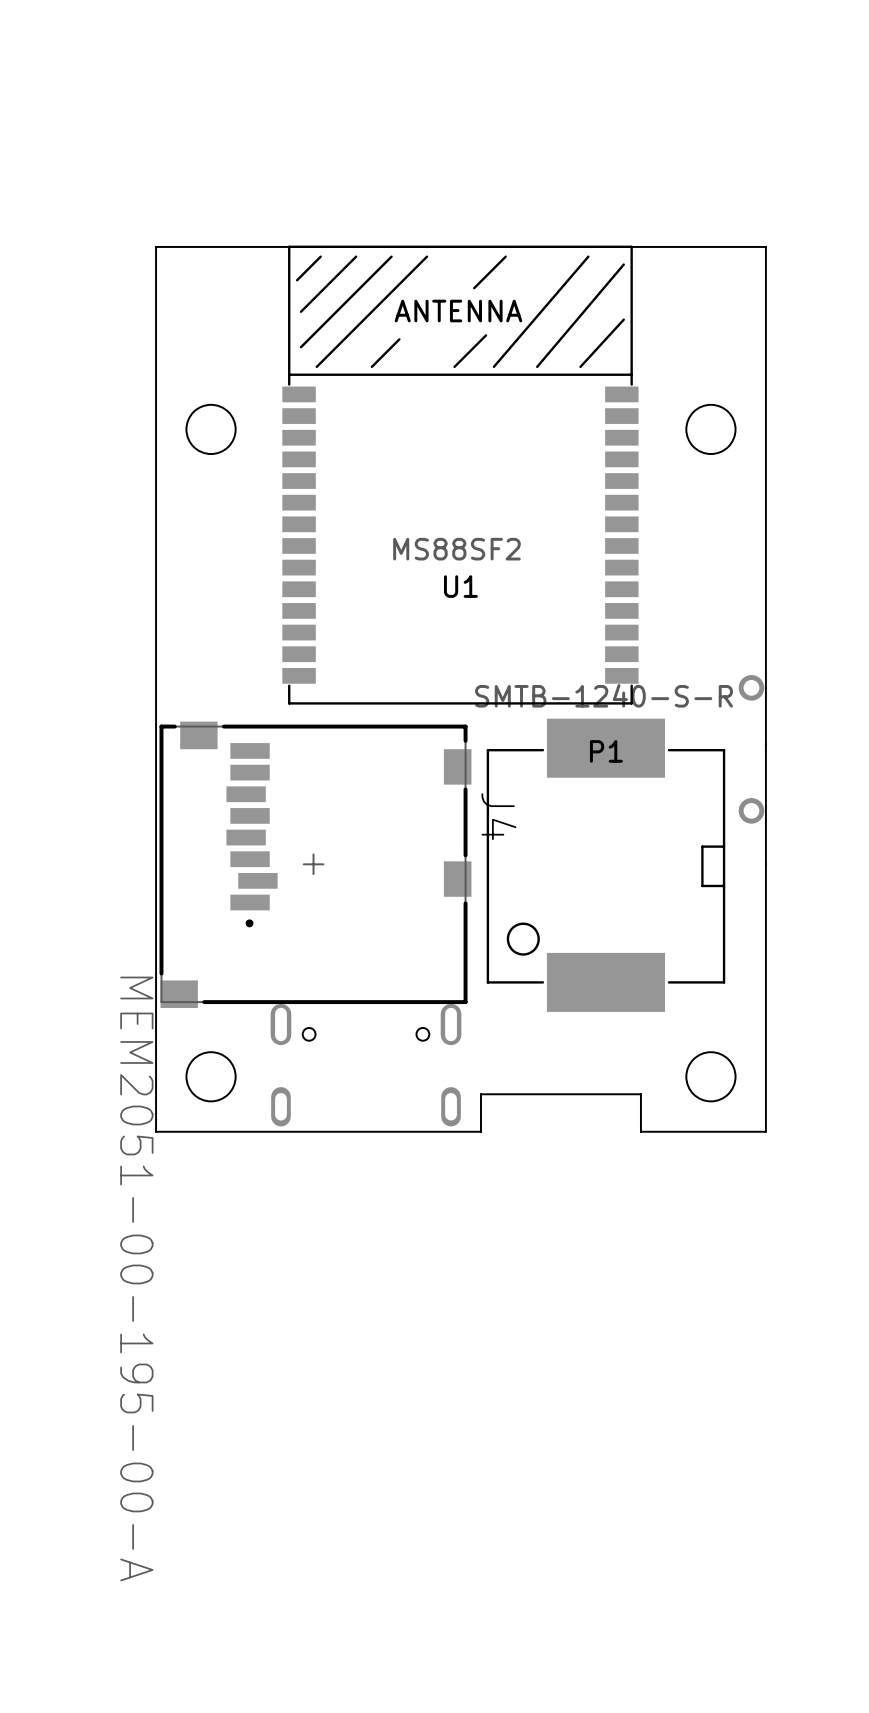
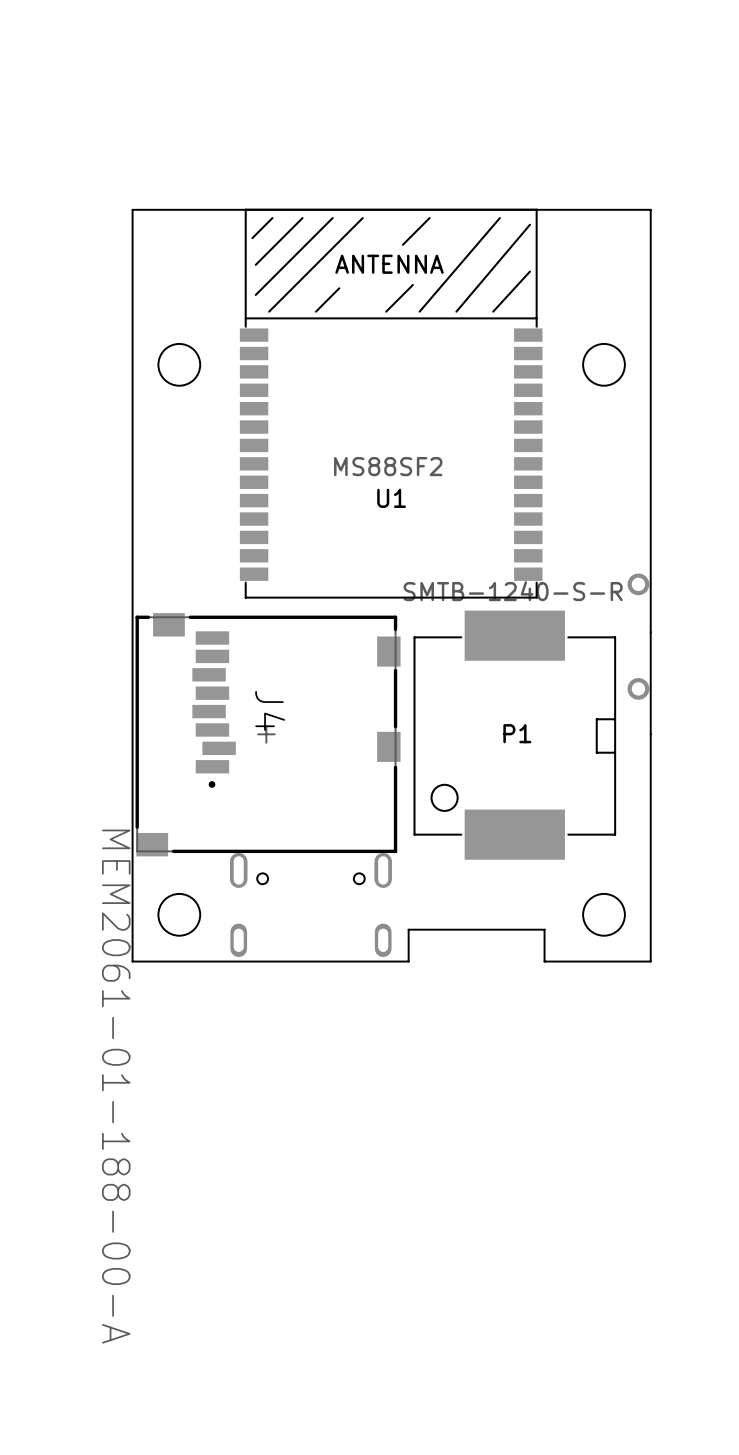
P1 name position: P1 (606, 751) -> P1 (517, 733)
J4 name position: J4 (498, 816) -> J4 (270, 710)
J4 value: MEM2051-00-195-00-A (136, 1278) -> MEM2061-01-188-00-A (116, 1086)

